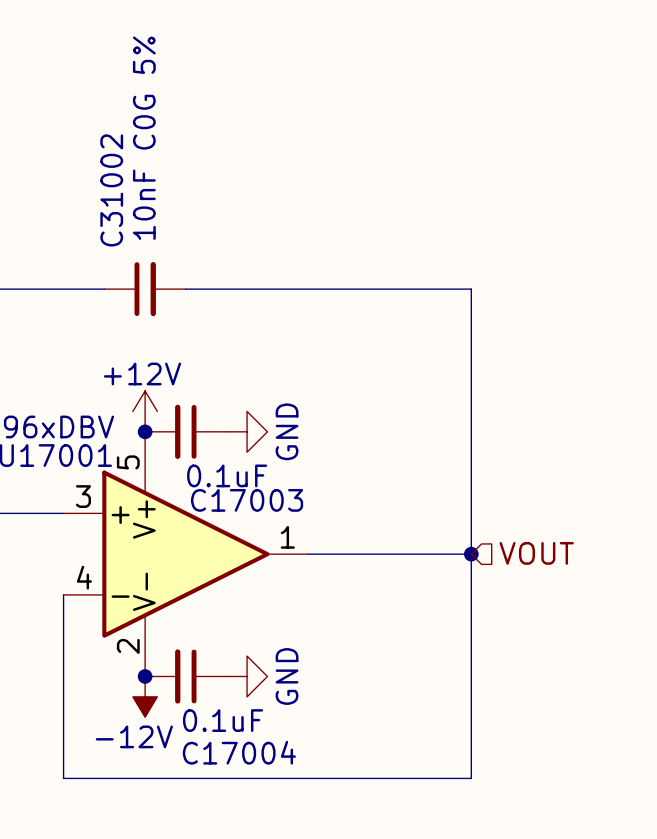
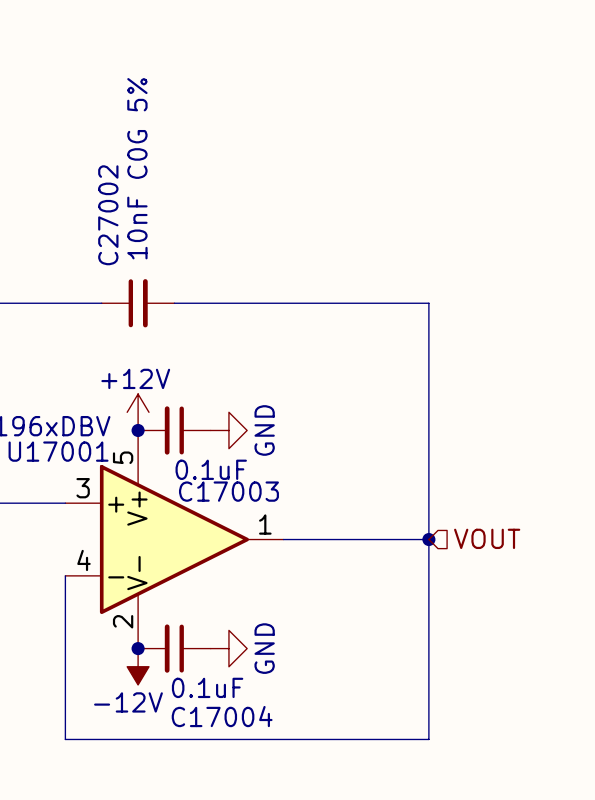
C31002 name: C31002 (111, 190) -> C27002 (108, 215)

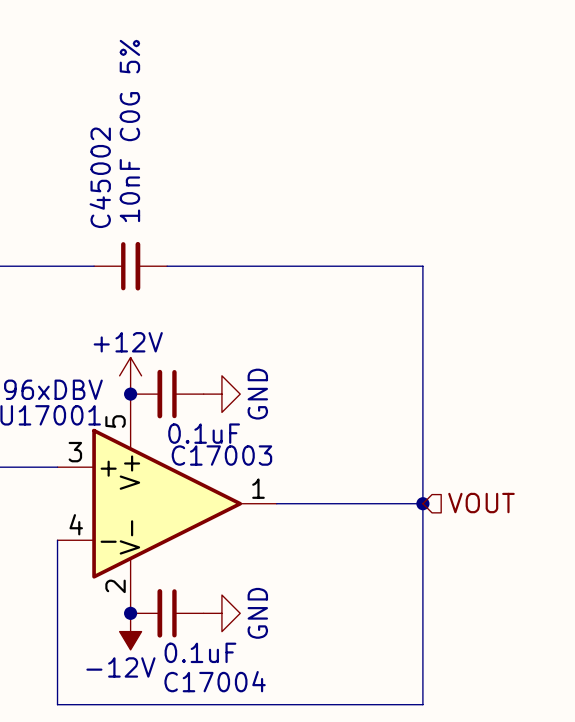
C27002 name: C27002 (108, 215) -> C45002 (100, 177)

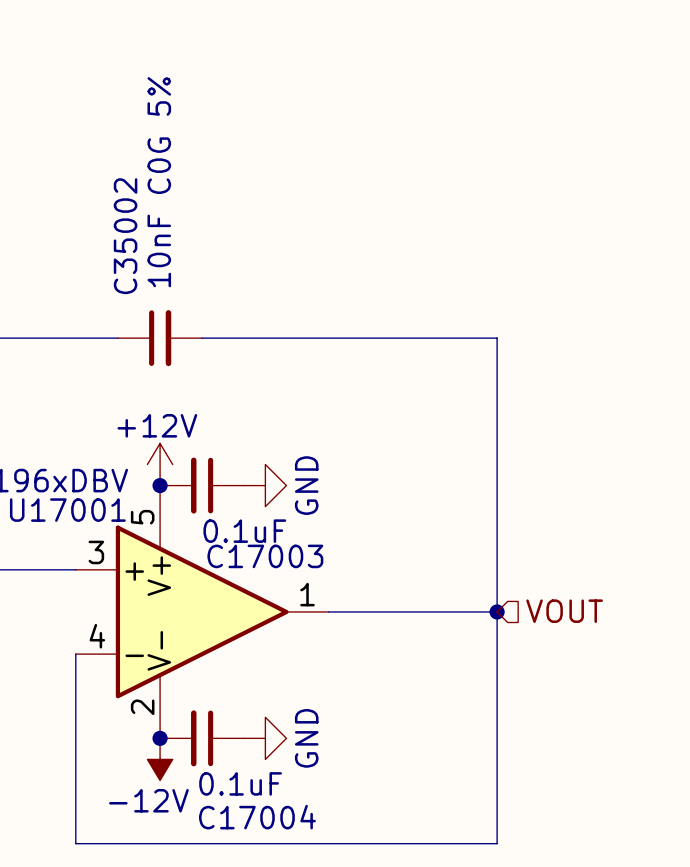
C45002 name: C45002 (100, 177) -> C35002 (125, 236)

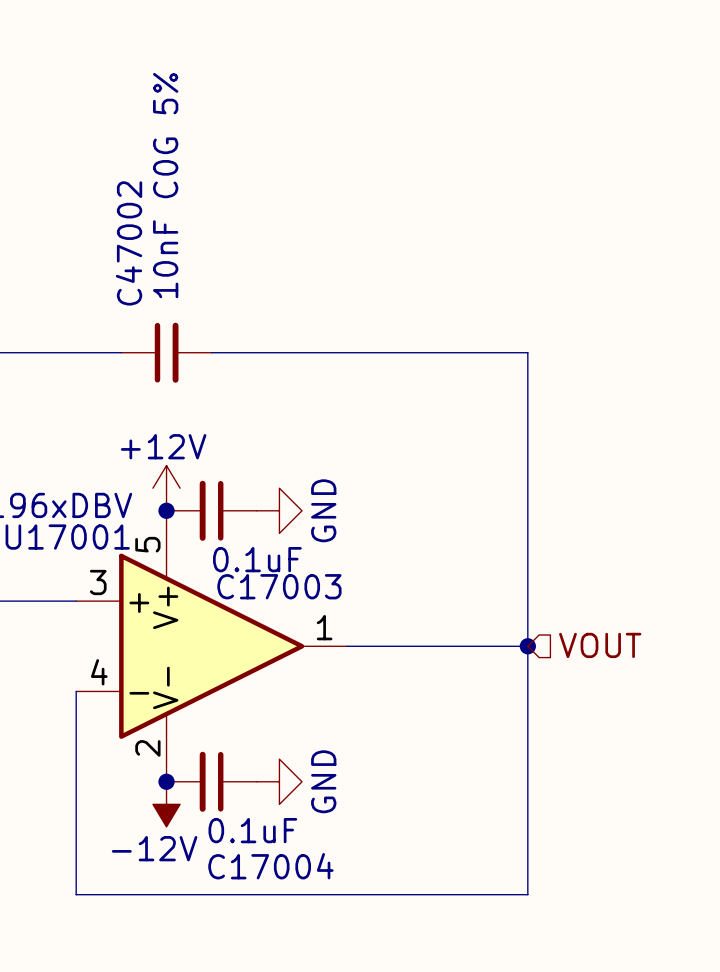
C35002 name: C35002 (125, 236) -> C47002 (129, 243)

